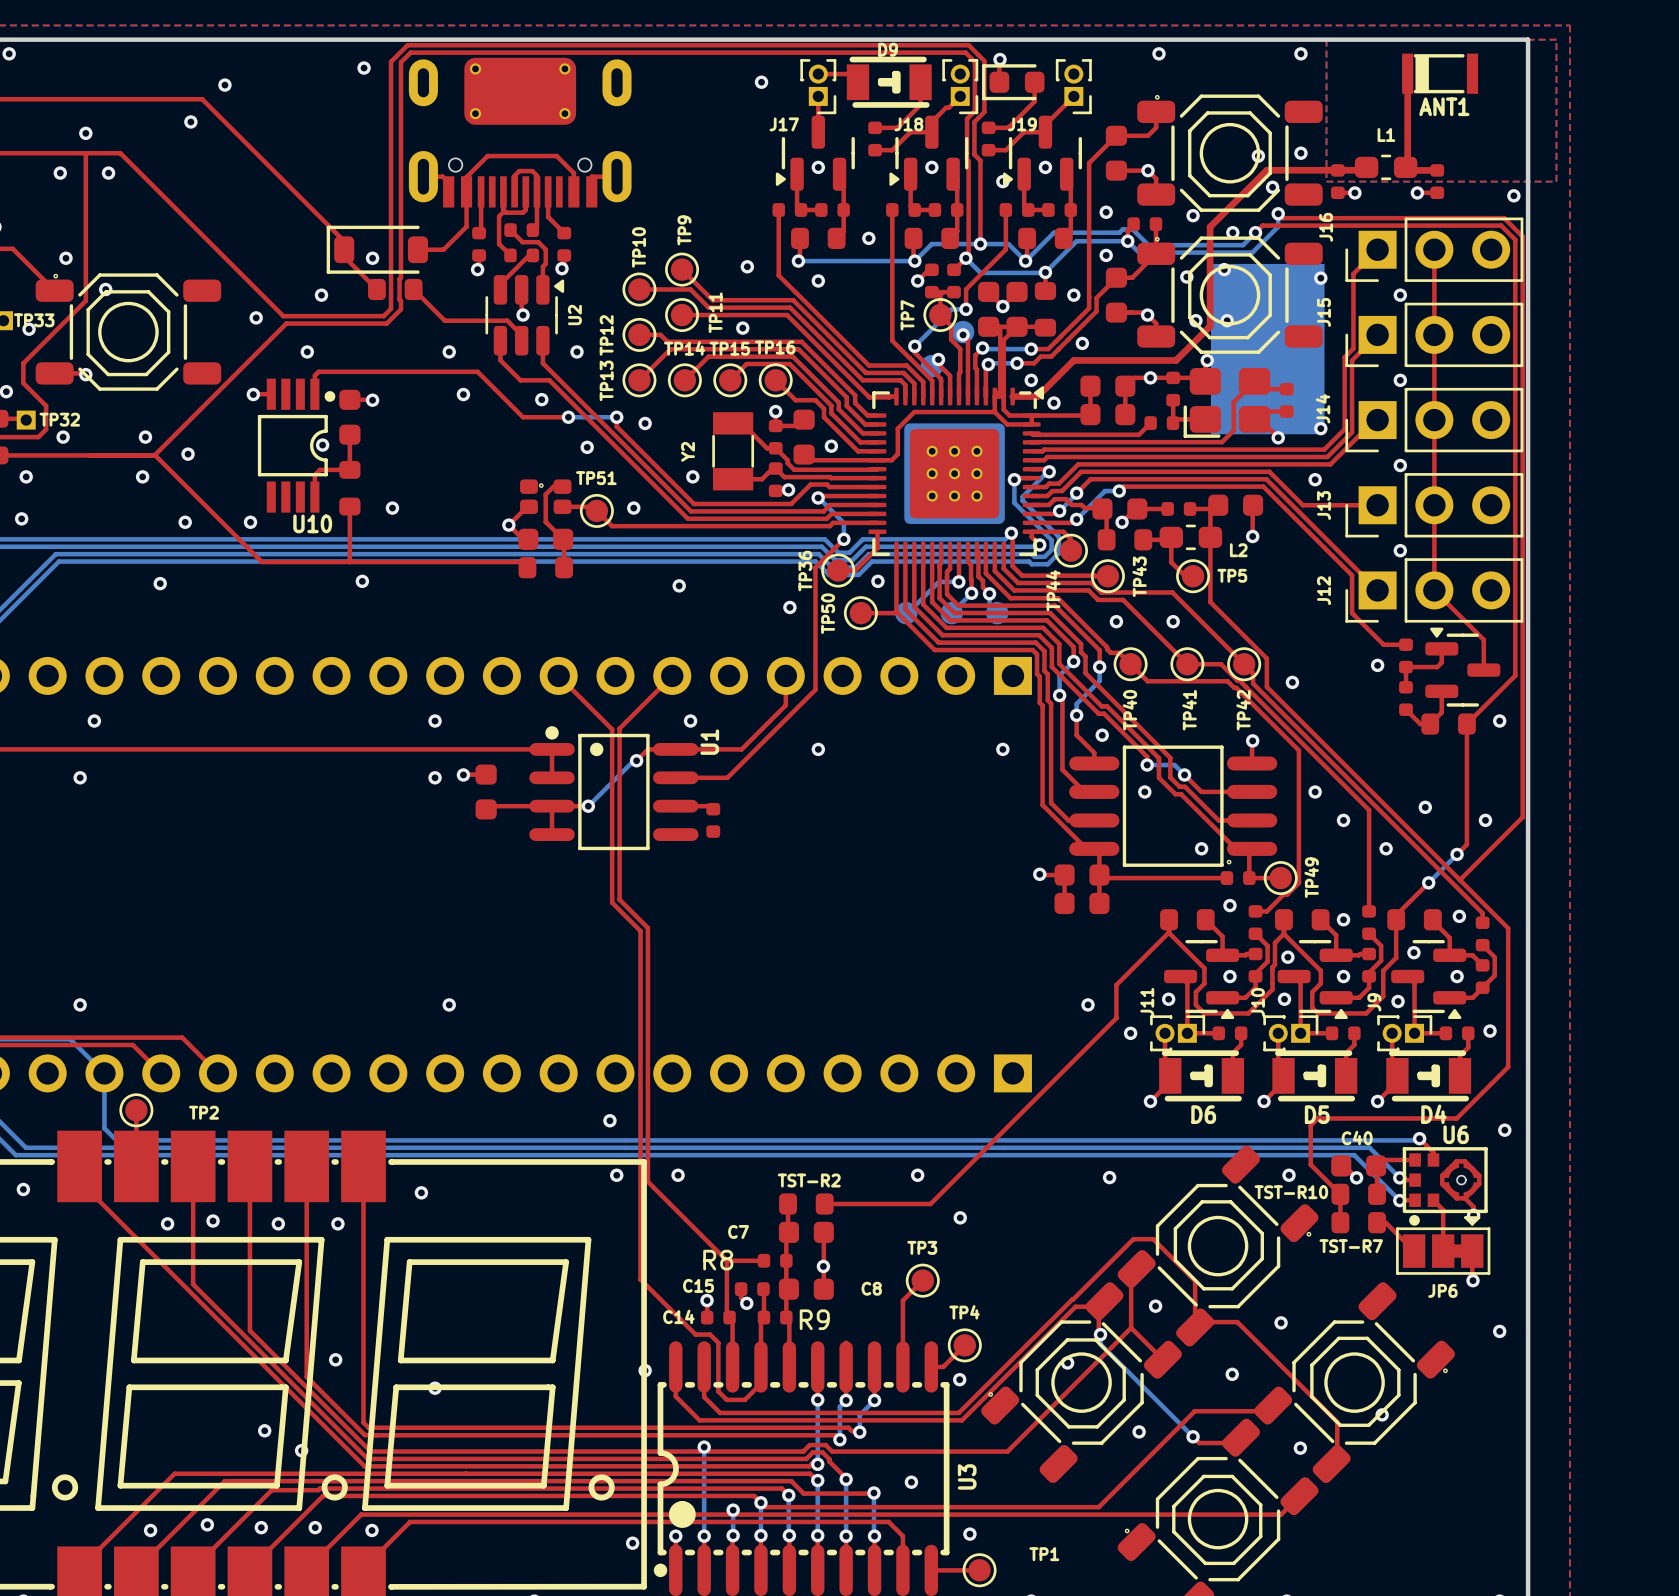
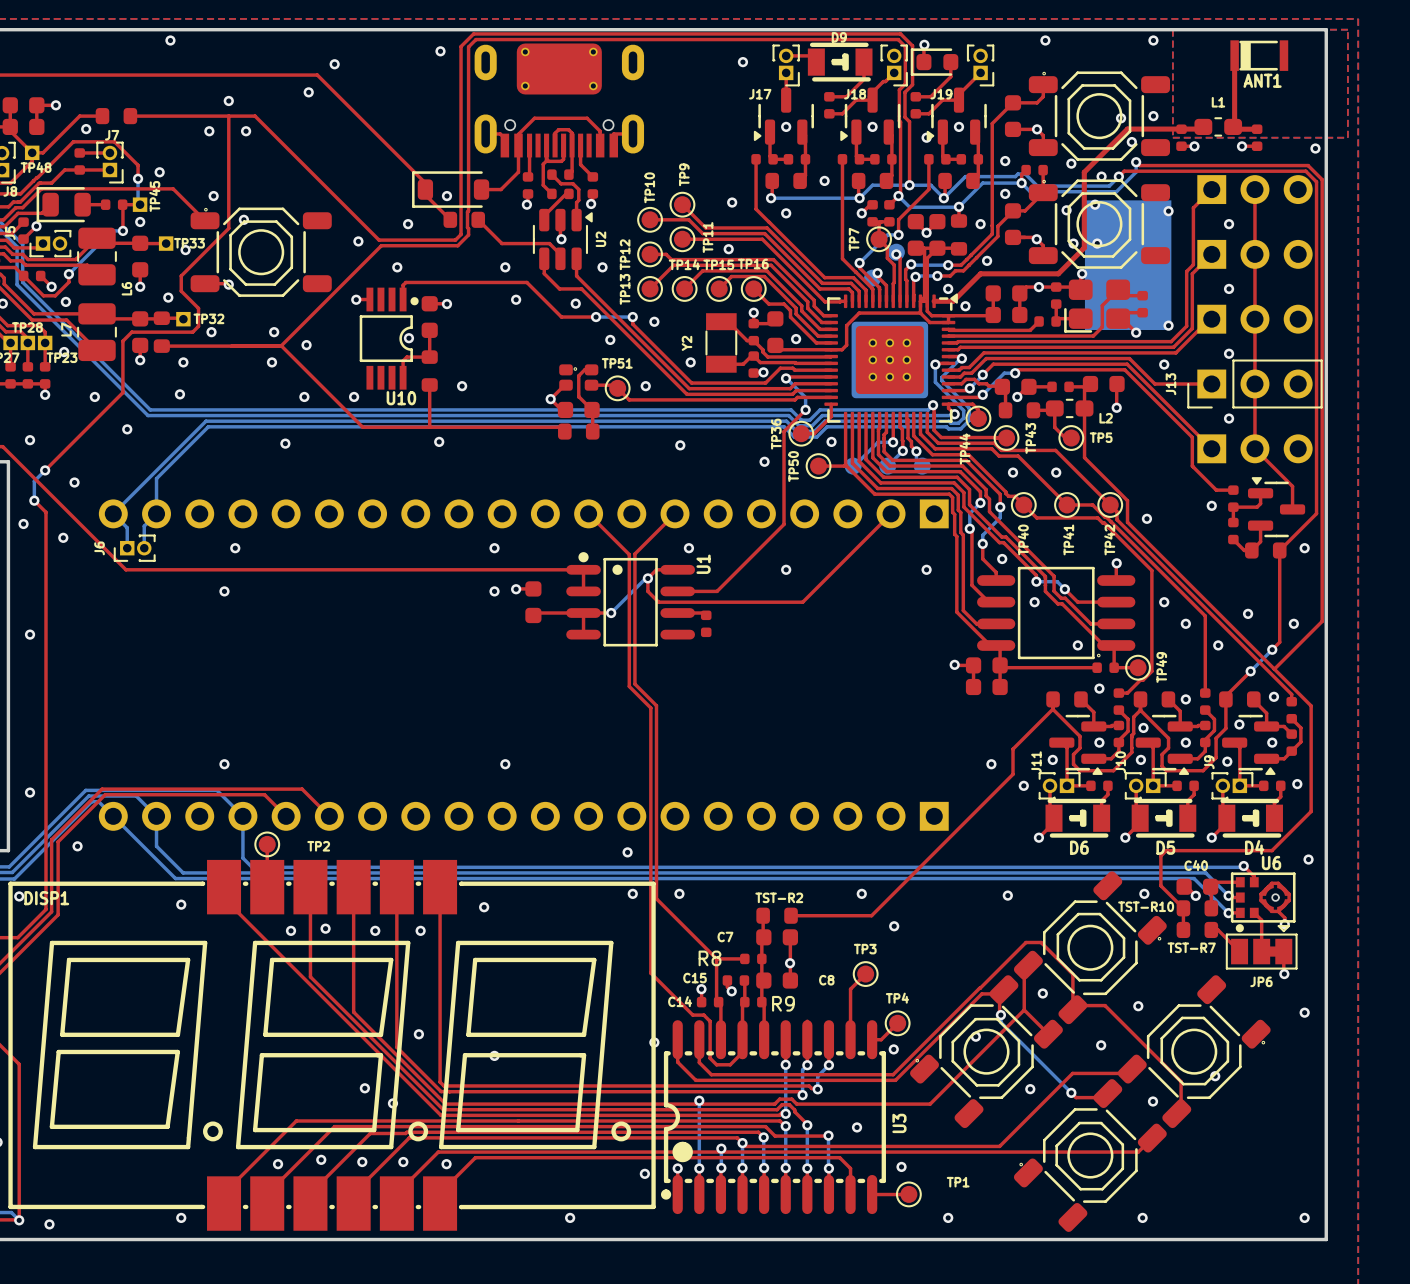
J16 side: top (1434, 249) -> bottom (1254, 189)
J15 side: top (1434, 334) -> bottom (1254, 254)
J14 side: top (1434, 420) -> bottom (1254, 319)
J12 side: top (1434, 590) -> bottom (1254, 448)
top track: (785, 675) (785, 705) (741, 749) (675, 749) -> none
top track: none -> (891, 513) (802, 602) (658, 602) (647, 591) (647, 578)

